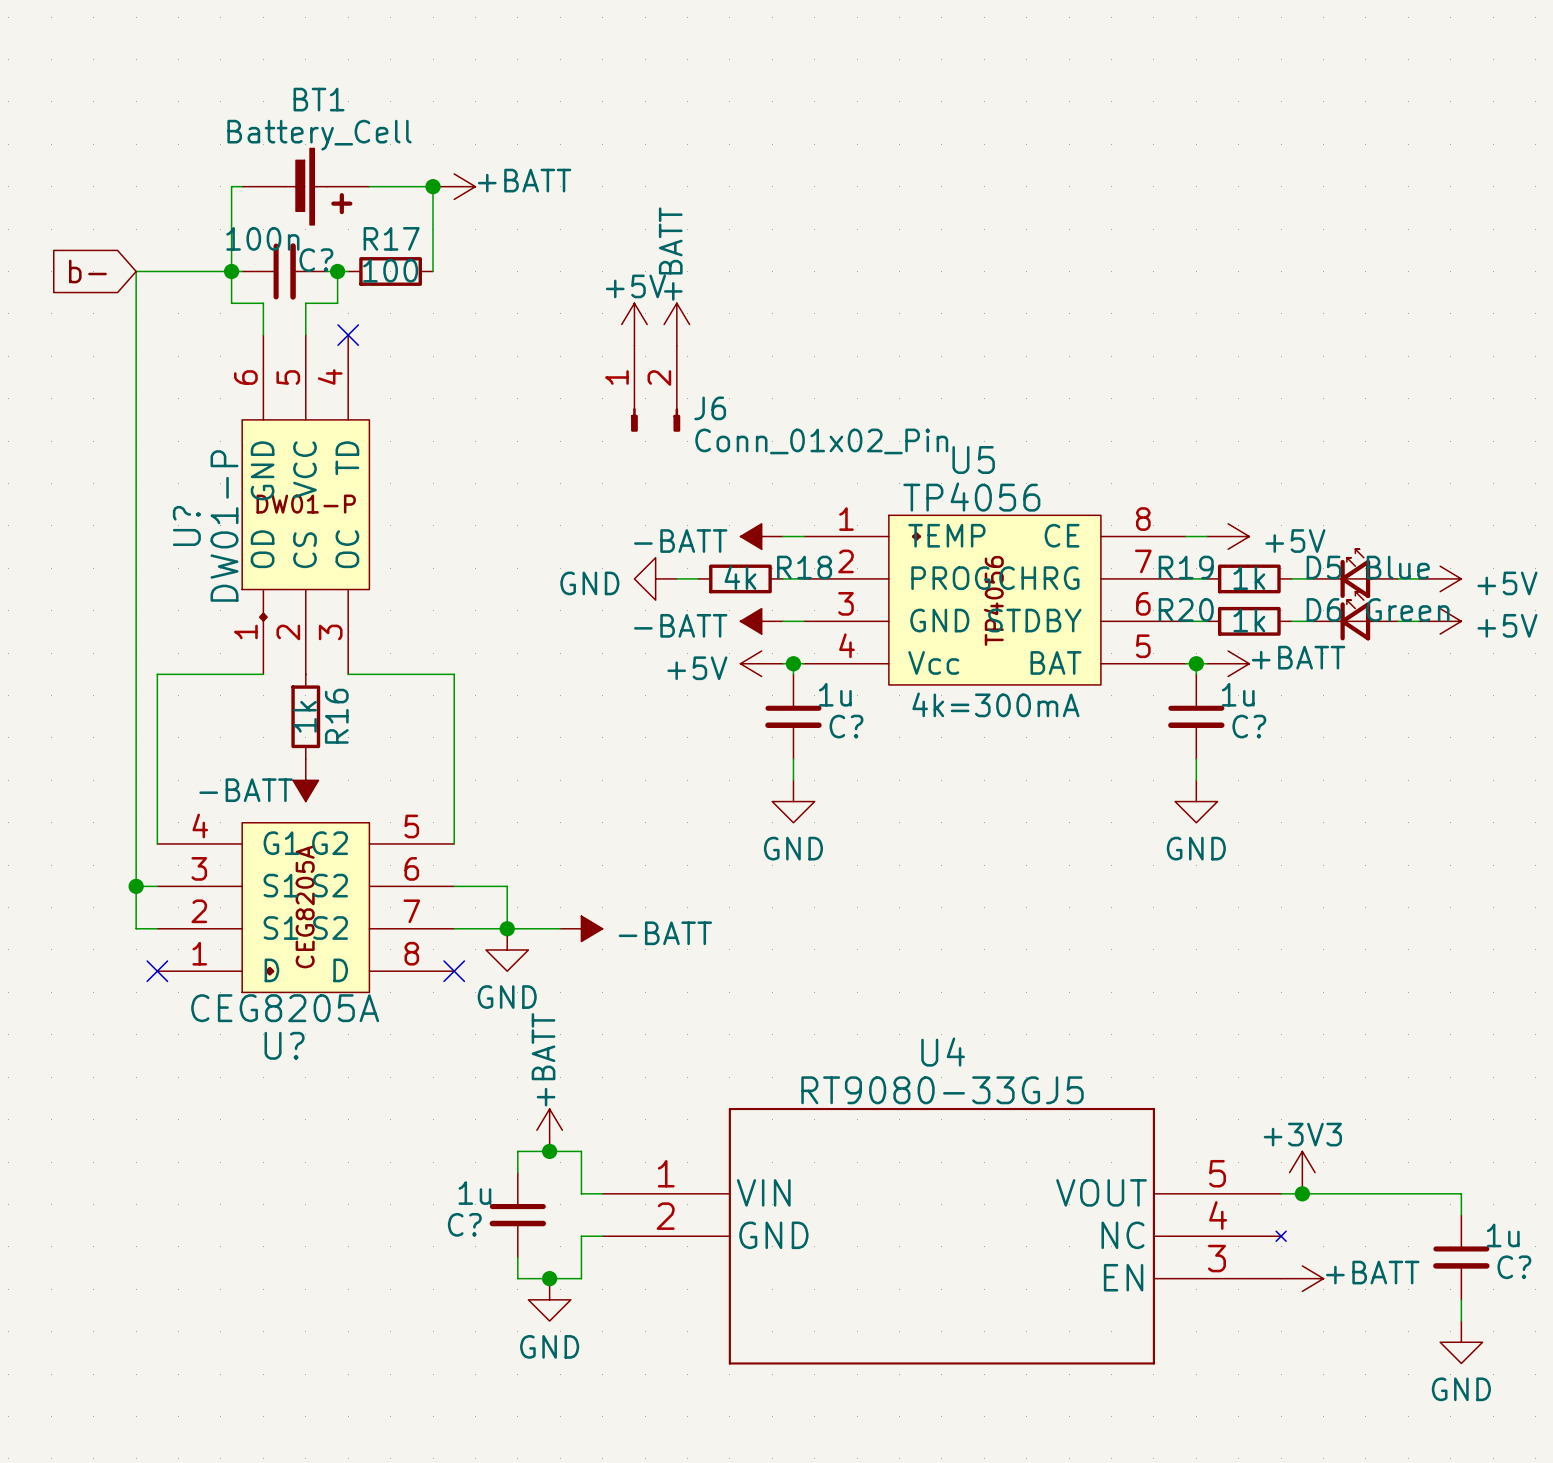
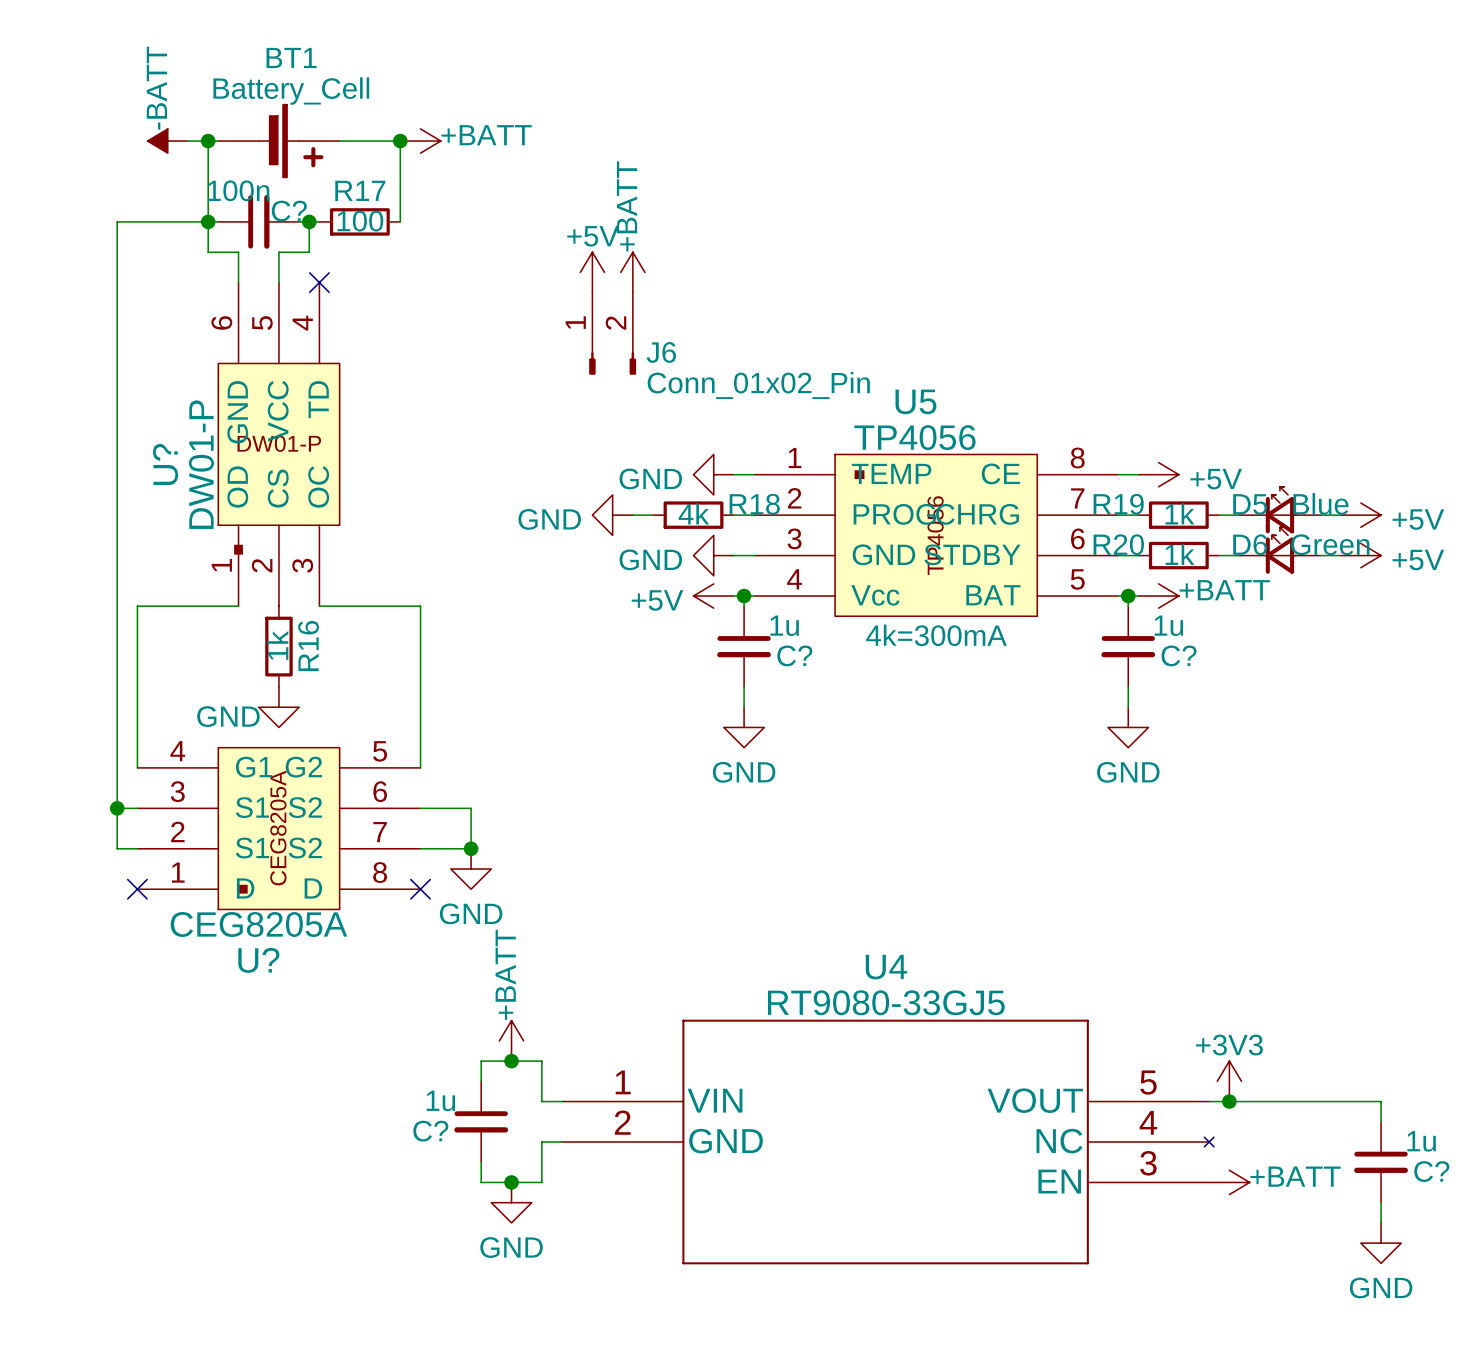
power symbol: none -> -BATT (167, 141)
wire: none -> (187, 141) (208, 141)
junction: none -> (208, 141)
global label: b- (87, 271) -> none
power symbol: -BATT (761, 536) -> GND (713, 474)
power symbol: -BATT (761, 621) -> GND (713, 555)
power symbol: -BATT (305, 780) -> GND (278, 707)
wire: (507, 928) (560, 928) -> none
power symbol: -BATT (581, 928) -> none

